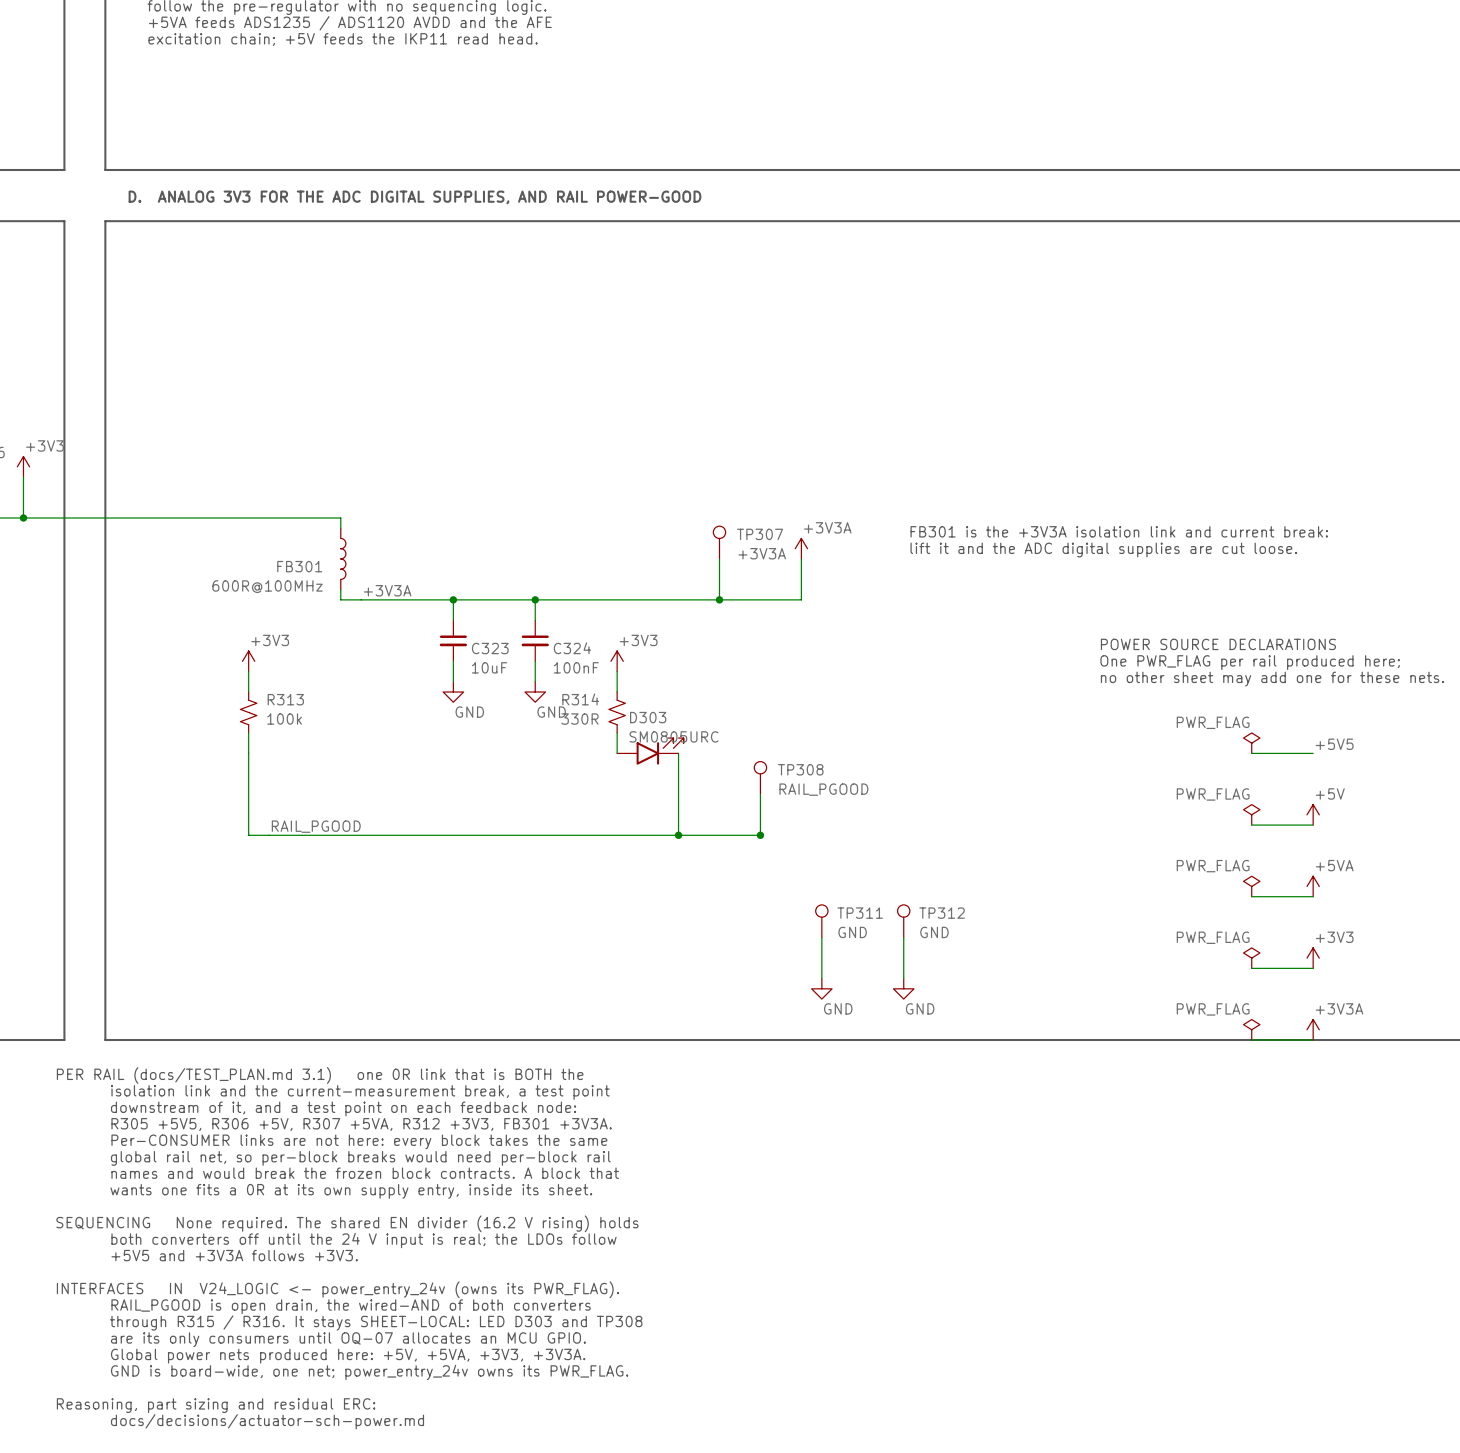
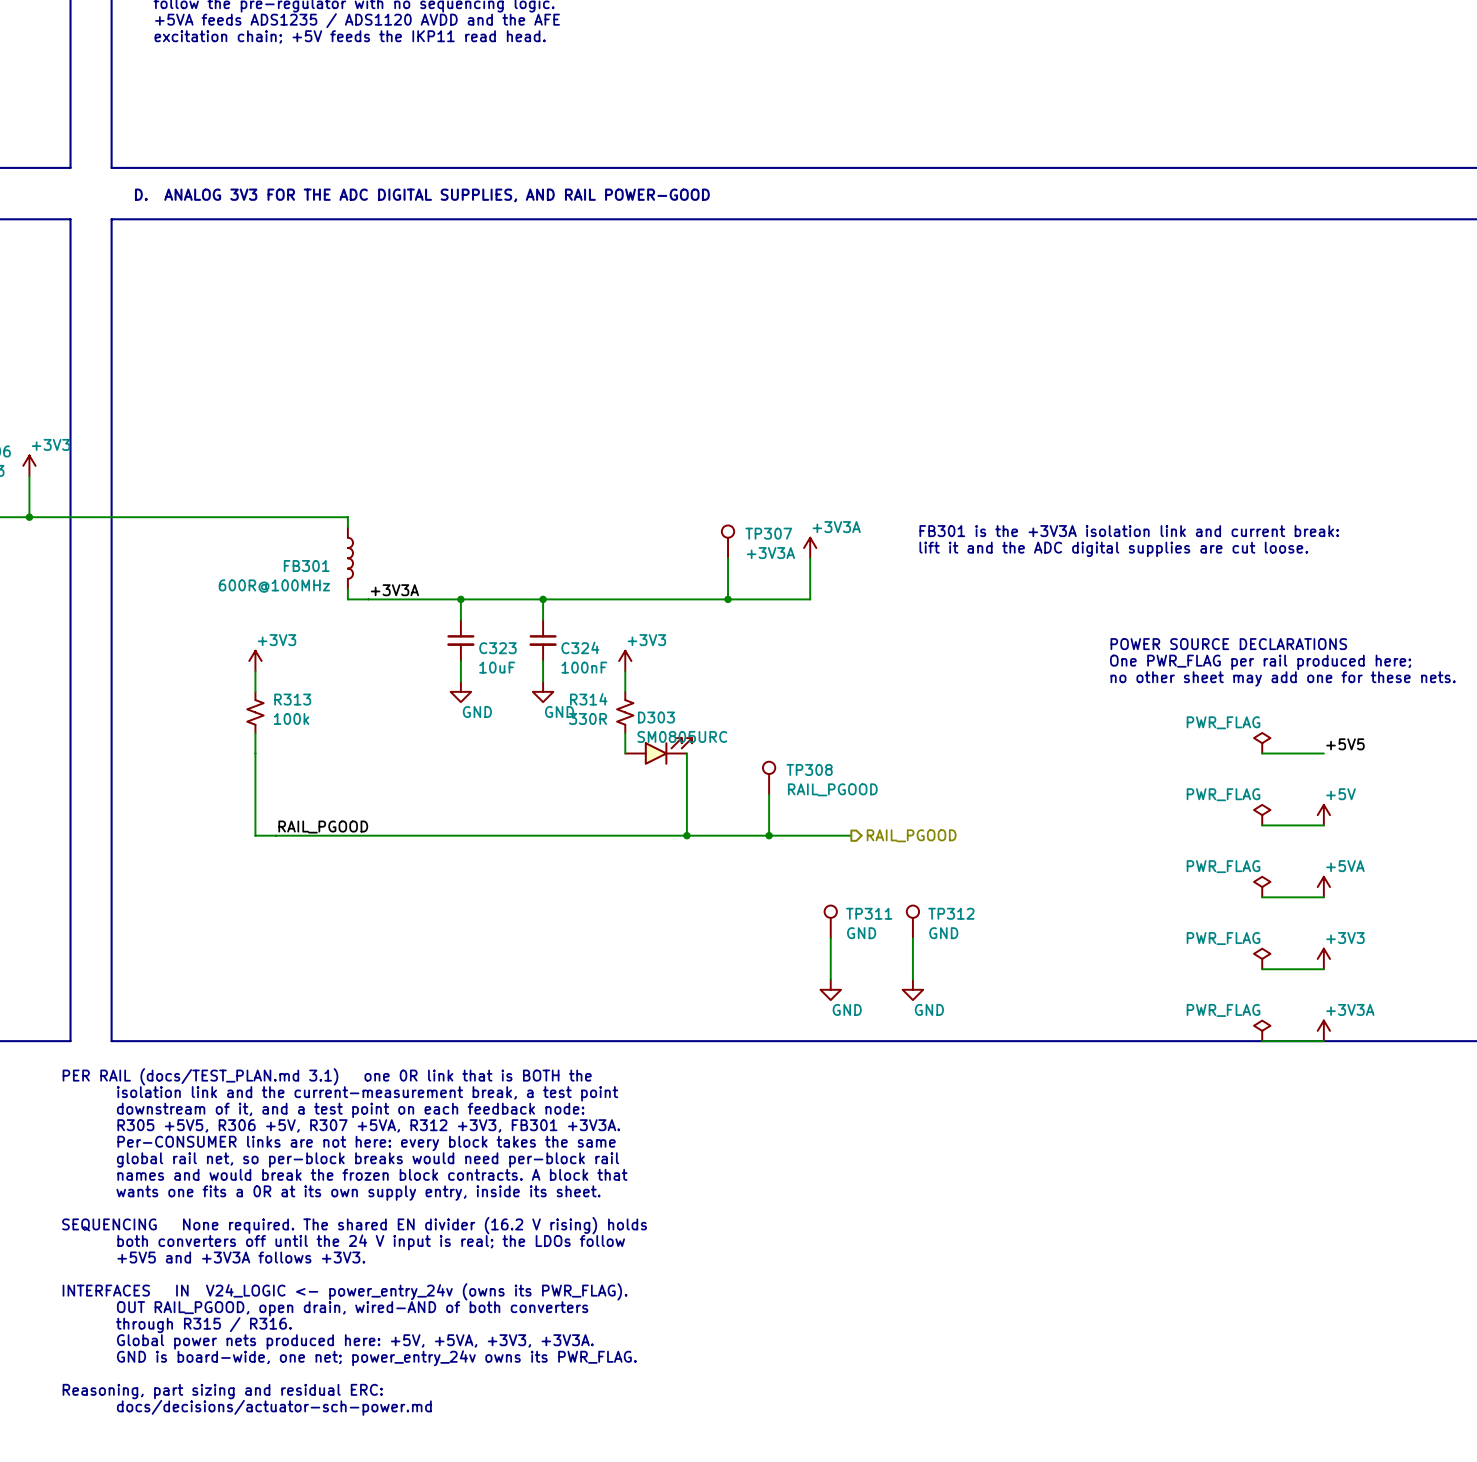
wire: none -> (769, 835) (851, 835)
hierarchical label: none -> RAIL_PGOOD (911, 835)
text: RAIL_PGOOD is open drain, the wired-AND of both converters (351, 1306) -> OUT RAIL_PGOOD, open drain, wired-AND of both converters (352, 1308)
text: through R315 / R316. It stays SHEET-LOCAL: LED D303 and TP308 (376, 1322) -> through R315 / R316. (203, 1325)
text: are its only consumers until OQ-07 allocates an MCU GPIO. (348, 1339) -> Global power nets produced here: +5V, +5VA, +3V3, +3V3A. (355, 1341)
text: Global power nets produced here: +5V, +5VA, +3V3, +3V3A. (348, 1356) -> GND is board-wide, one net; power_entry_24v owns its PWR_FLAG. (376, 1358)
text: GND is board-wide, one net; power_entry_24v owns its PWR_FLAG. (369, 1372) -> none
text: none -> Reasoning, part sizing and residual ERC: (222, 1391)
text: Reasoning, part sizing and residual ERC: (216, 1405) -> docs/decisions/actuator-sch-power.md (274, 1407)
text: docs/decisions/actuator-sch-power.md (267, 1421) -> none

